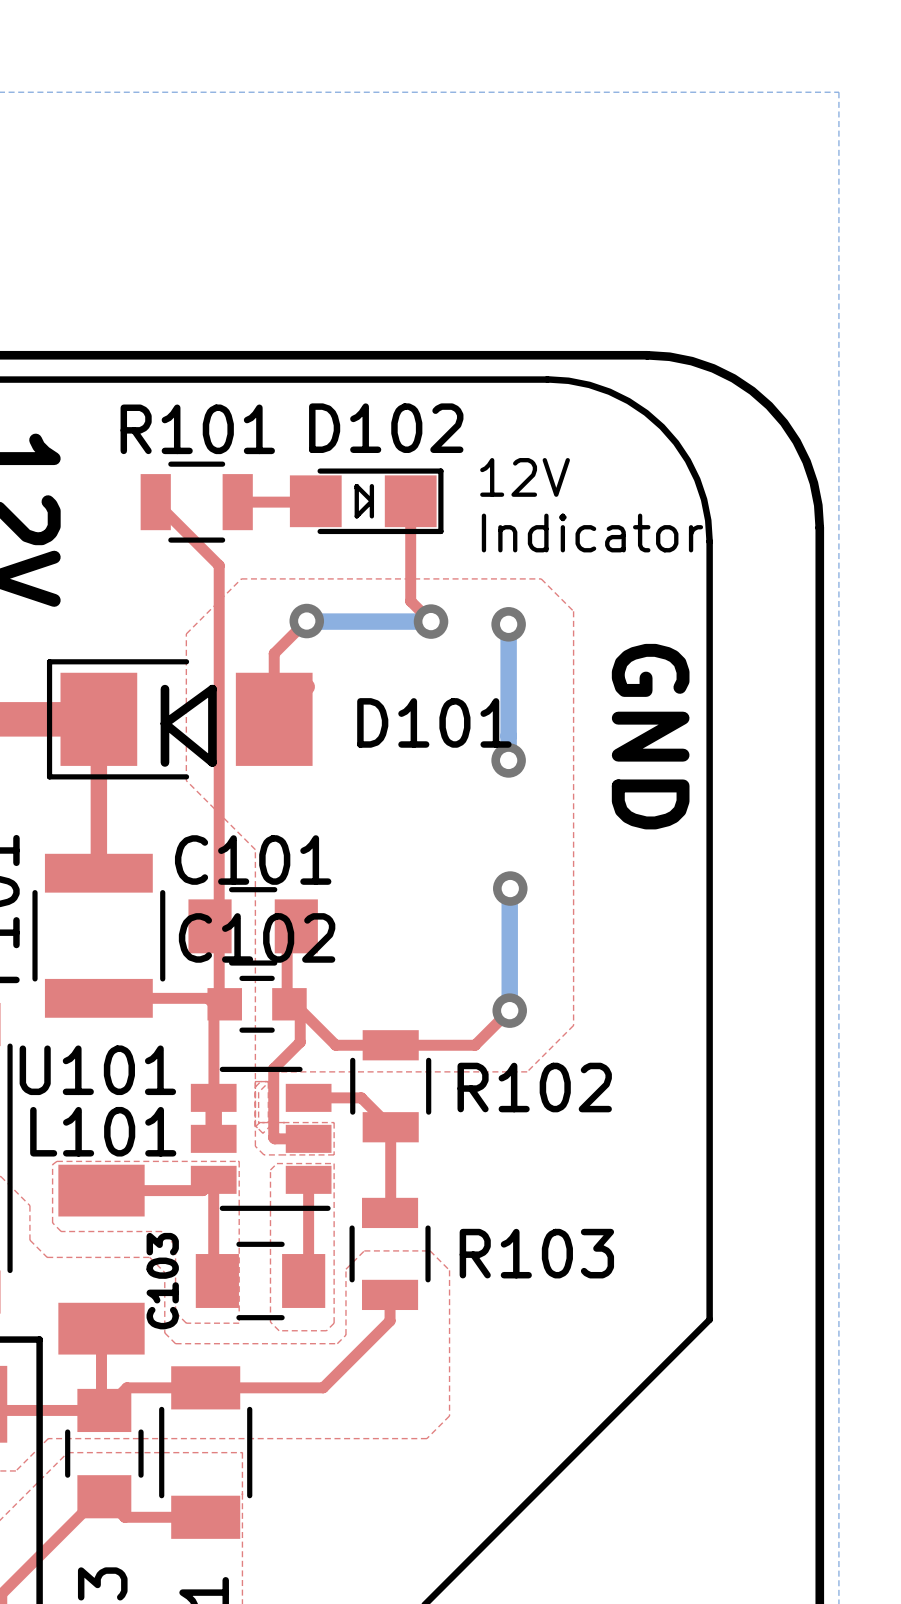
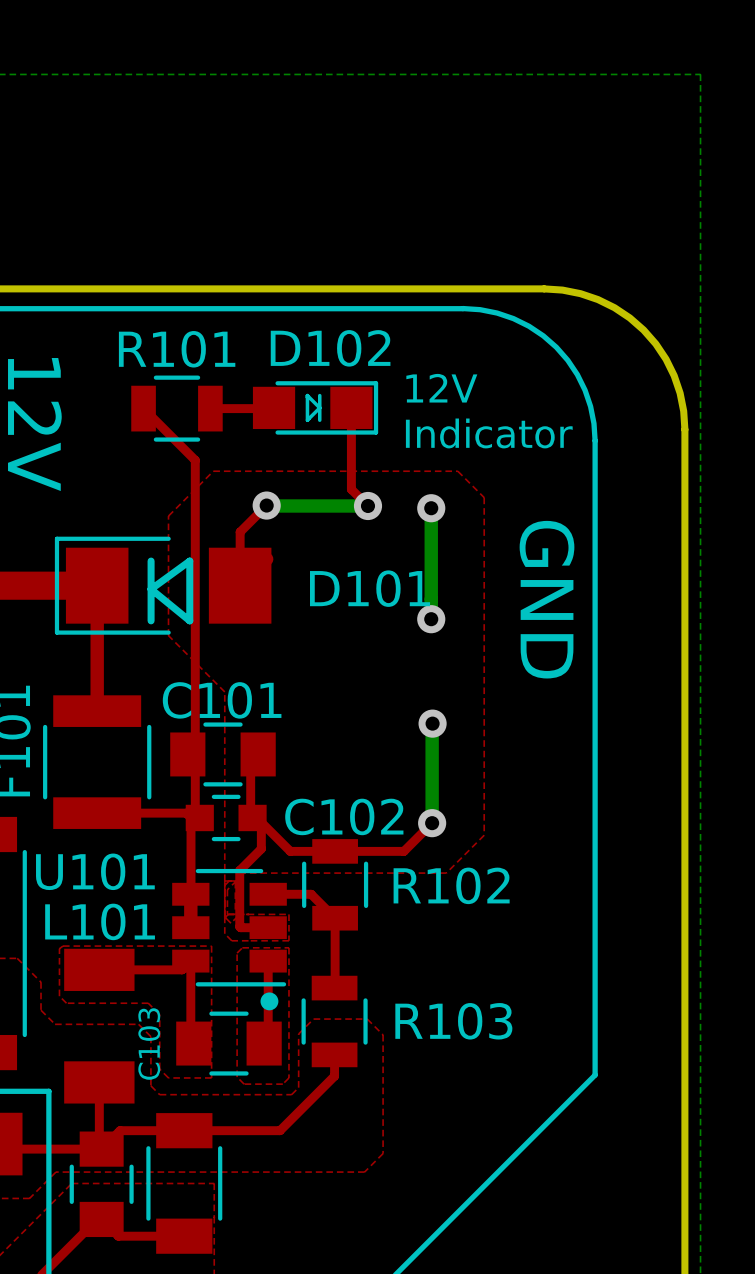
C102 name position: C102 (257, 937) -> C102 (344, 816)
drawing: none -> [260, 992, 279, 1011]

